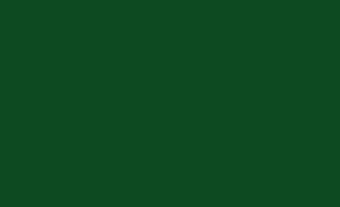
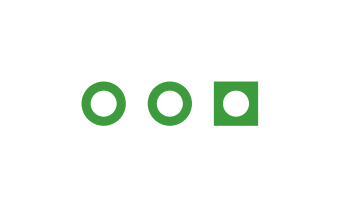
part: none -> (169, 103)

